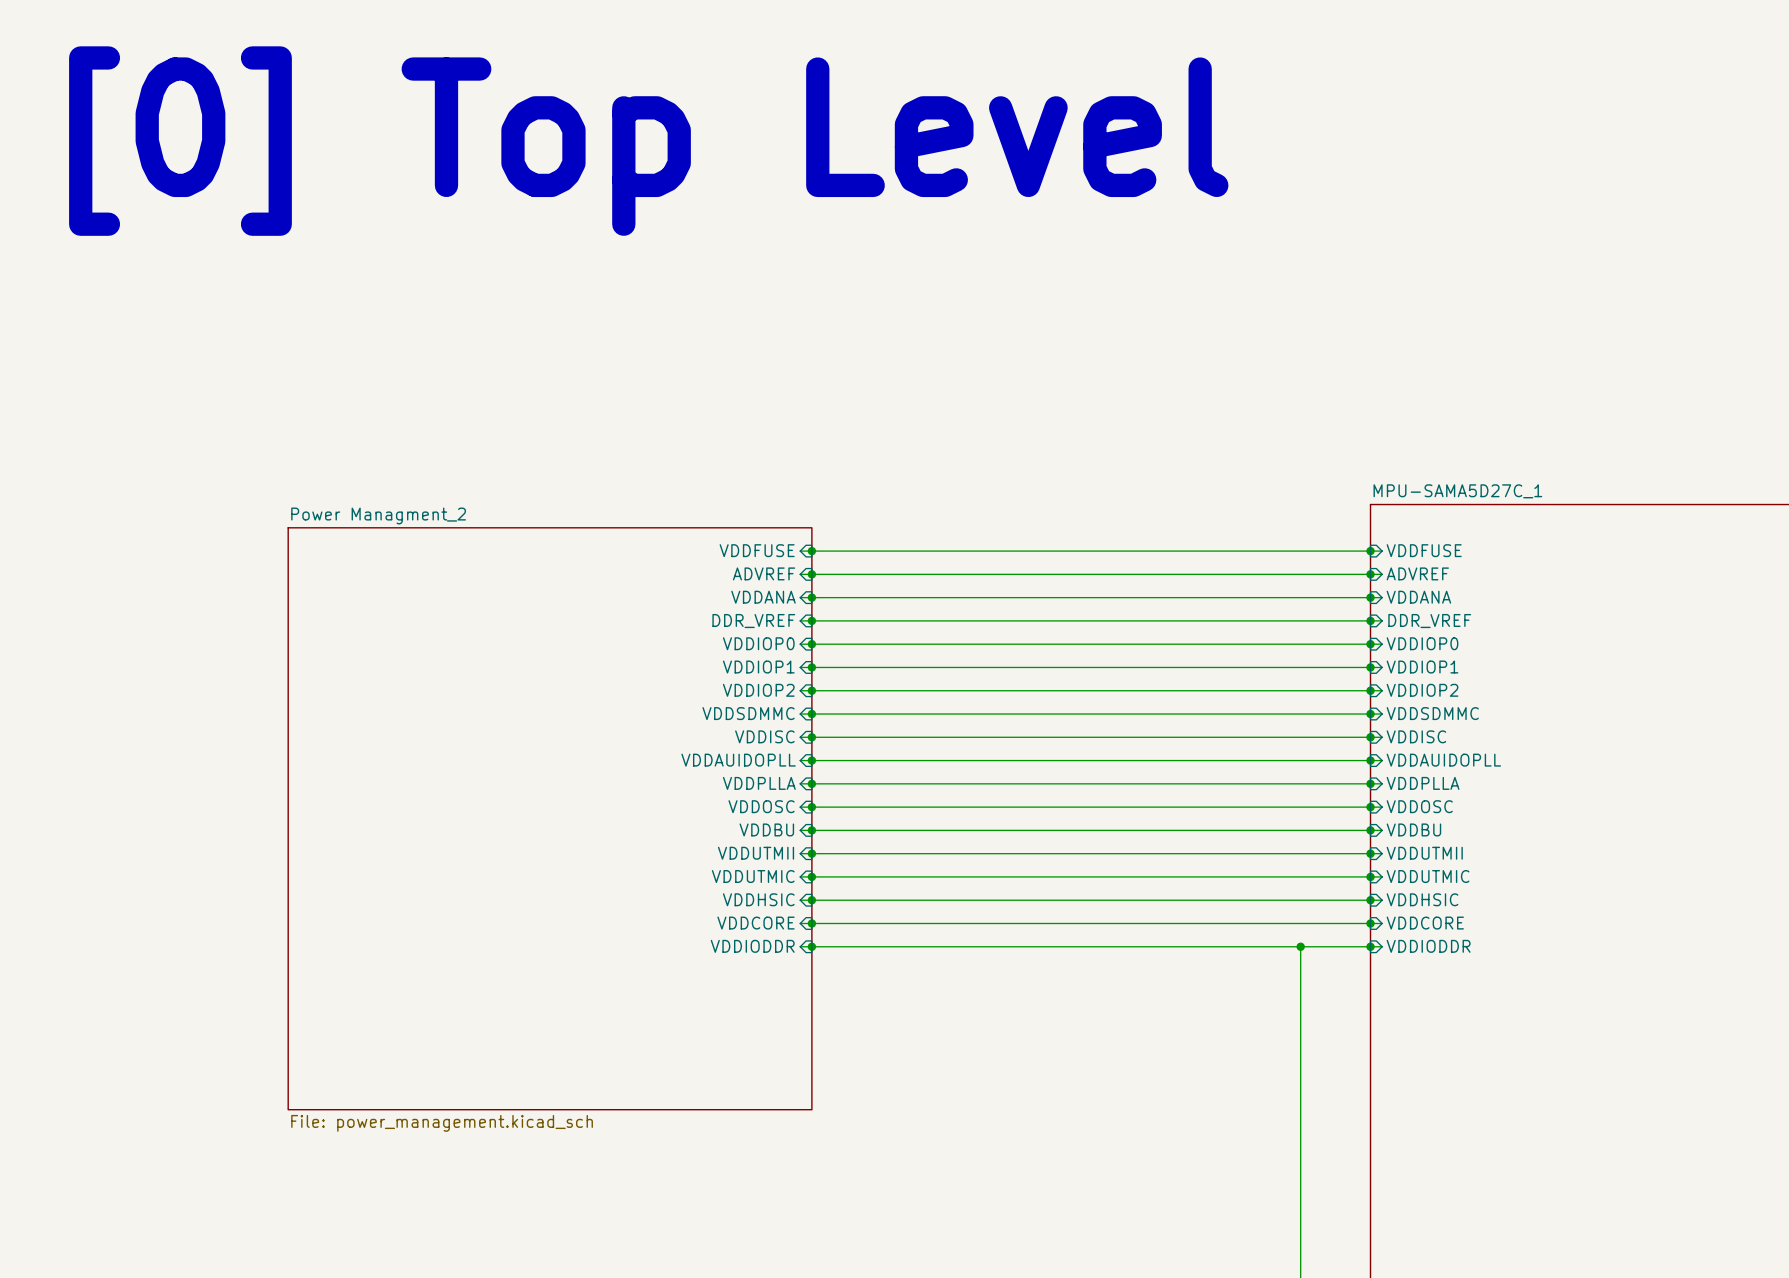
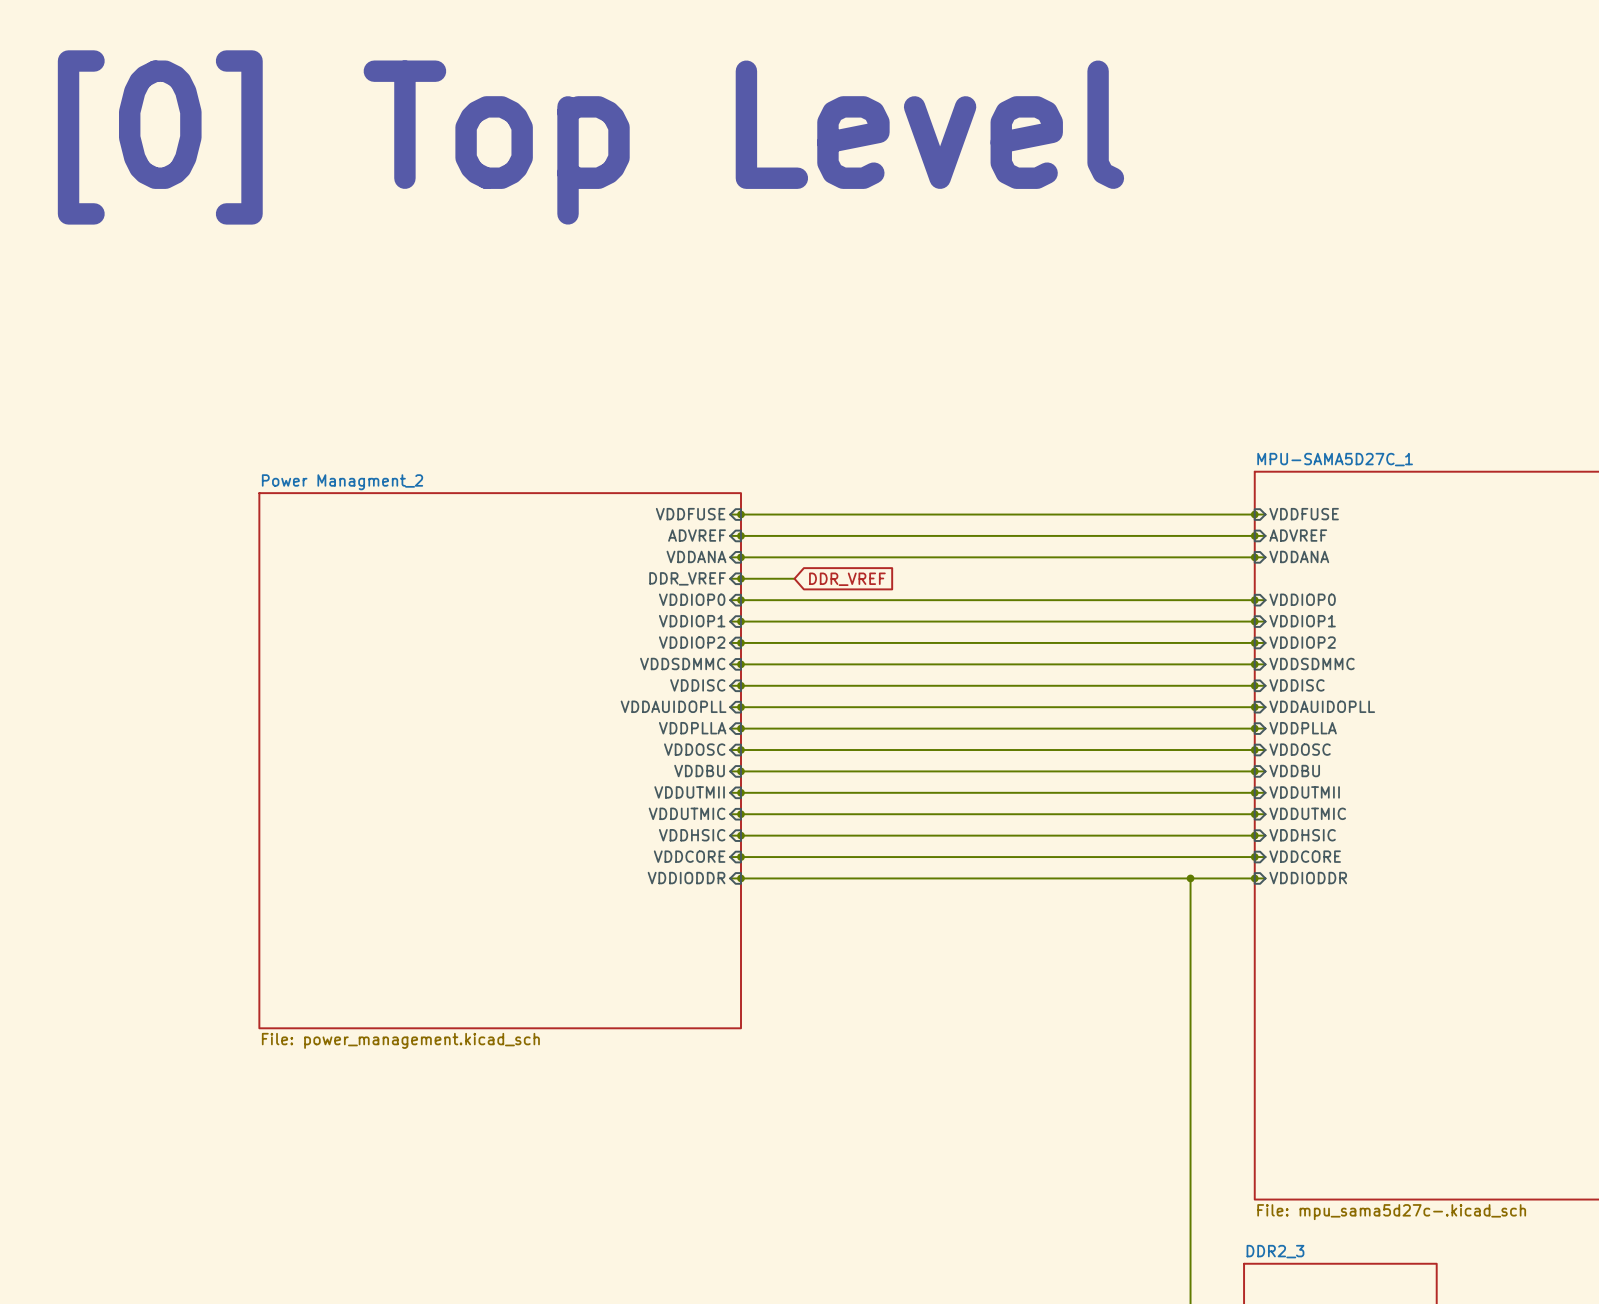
wire: (870, 620) (1382, 620) -> none
junction: (1370, 620) -> none
global label: none -> DDR_VREF (847, 579)
sheet pin: DDR_VREF (1429, 621) -> none

